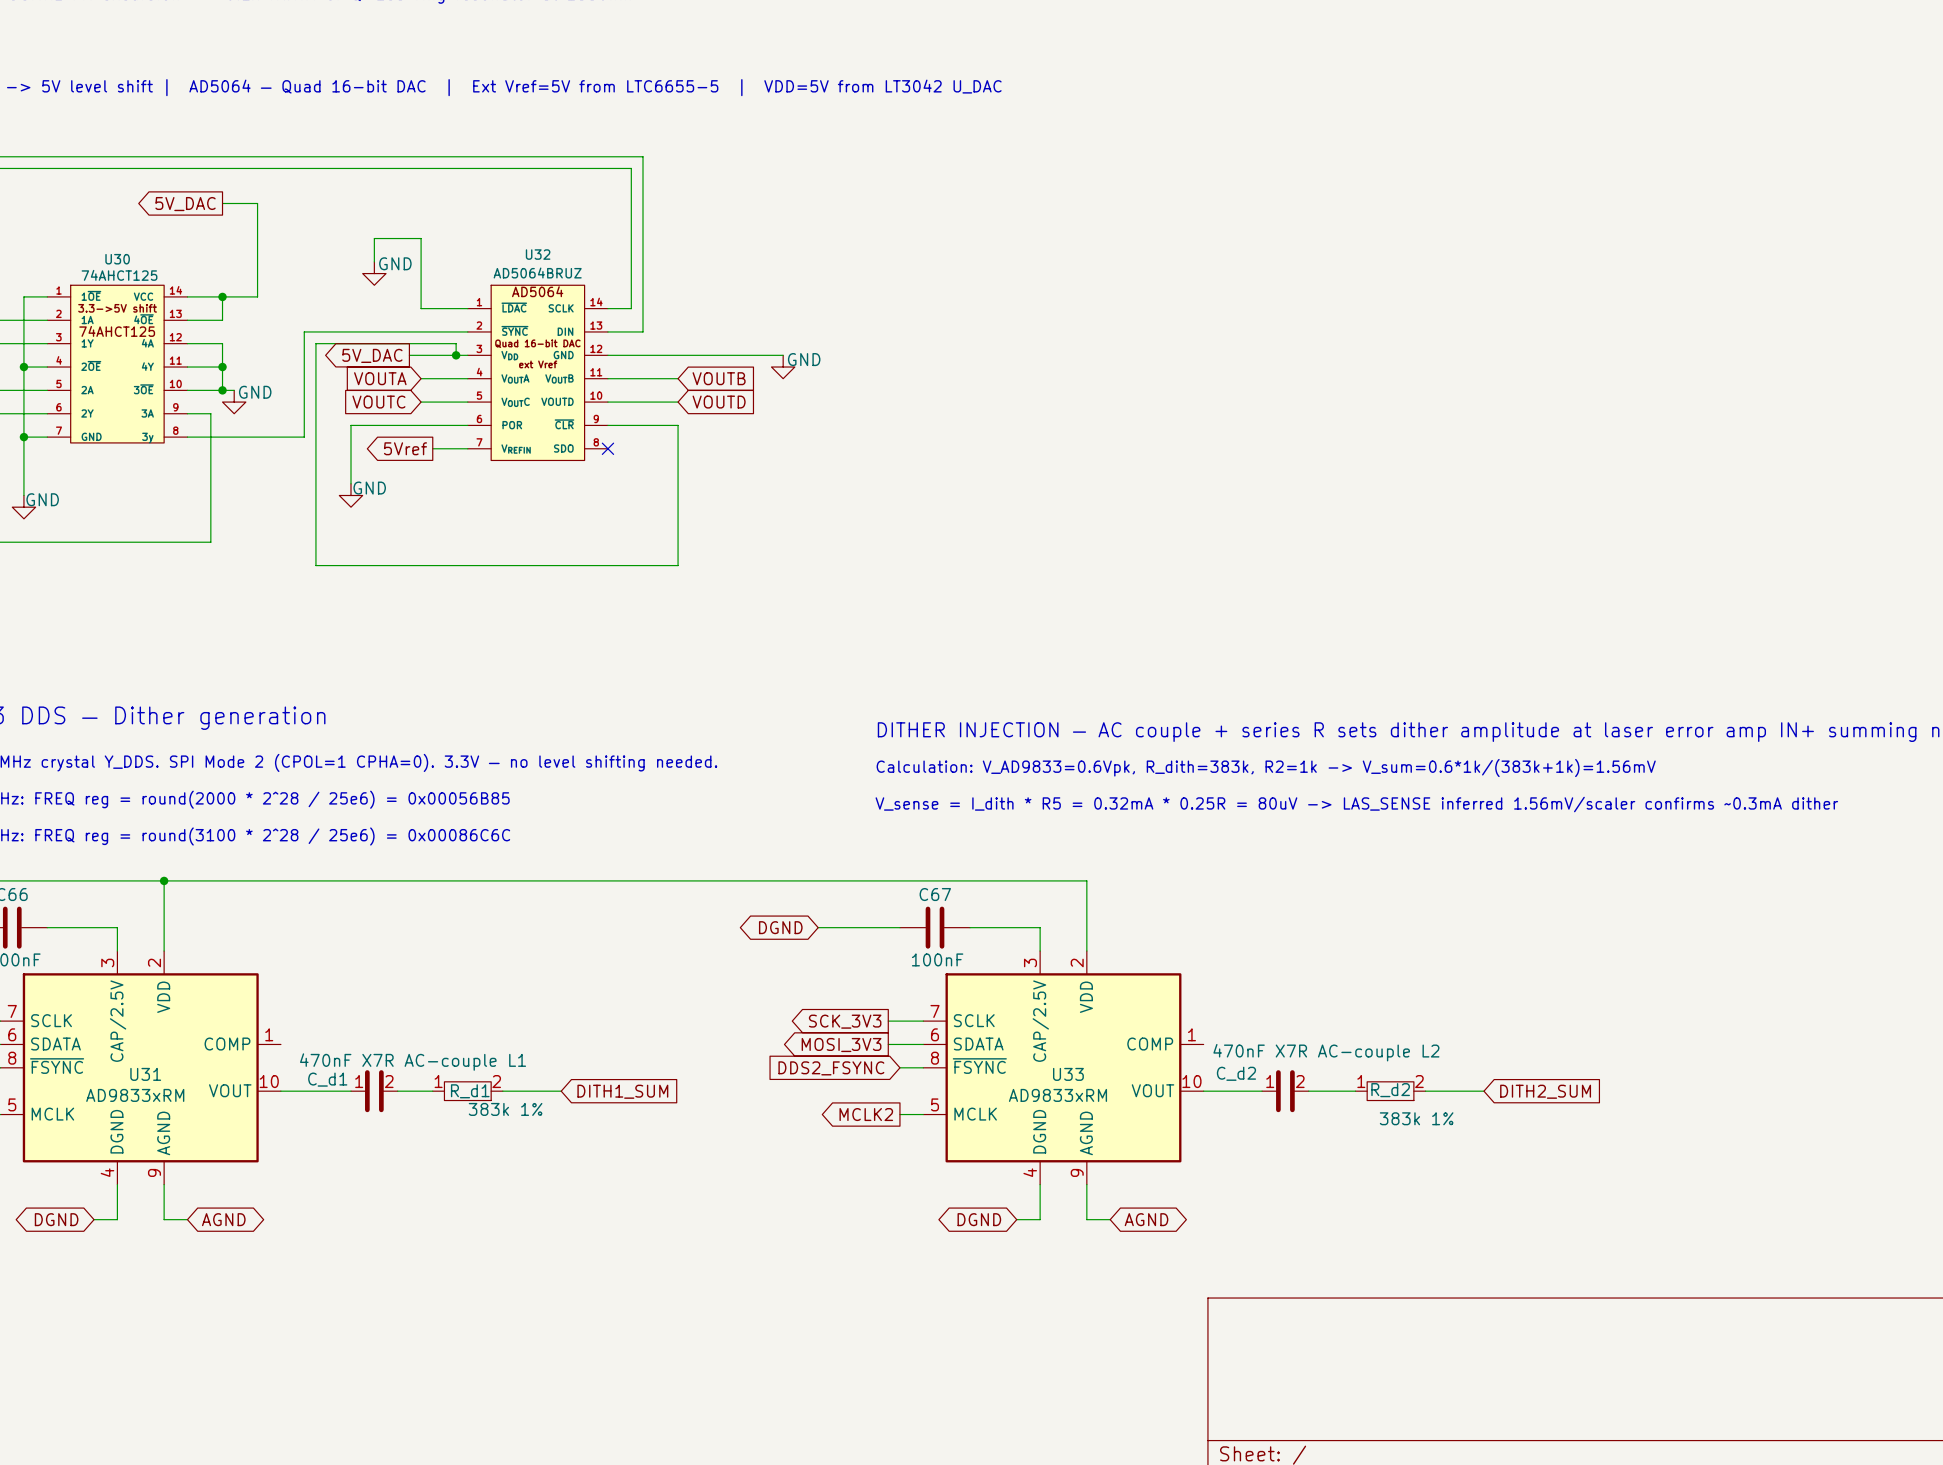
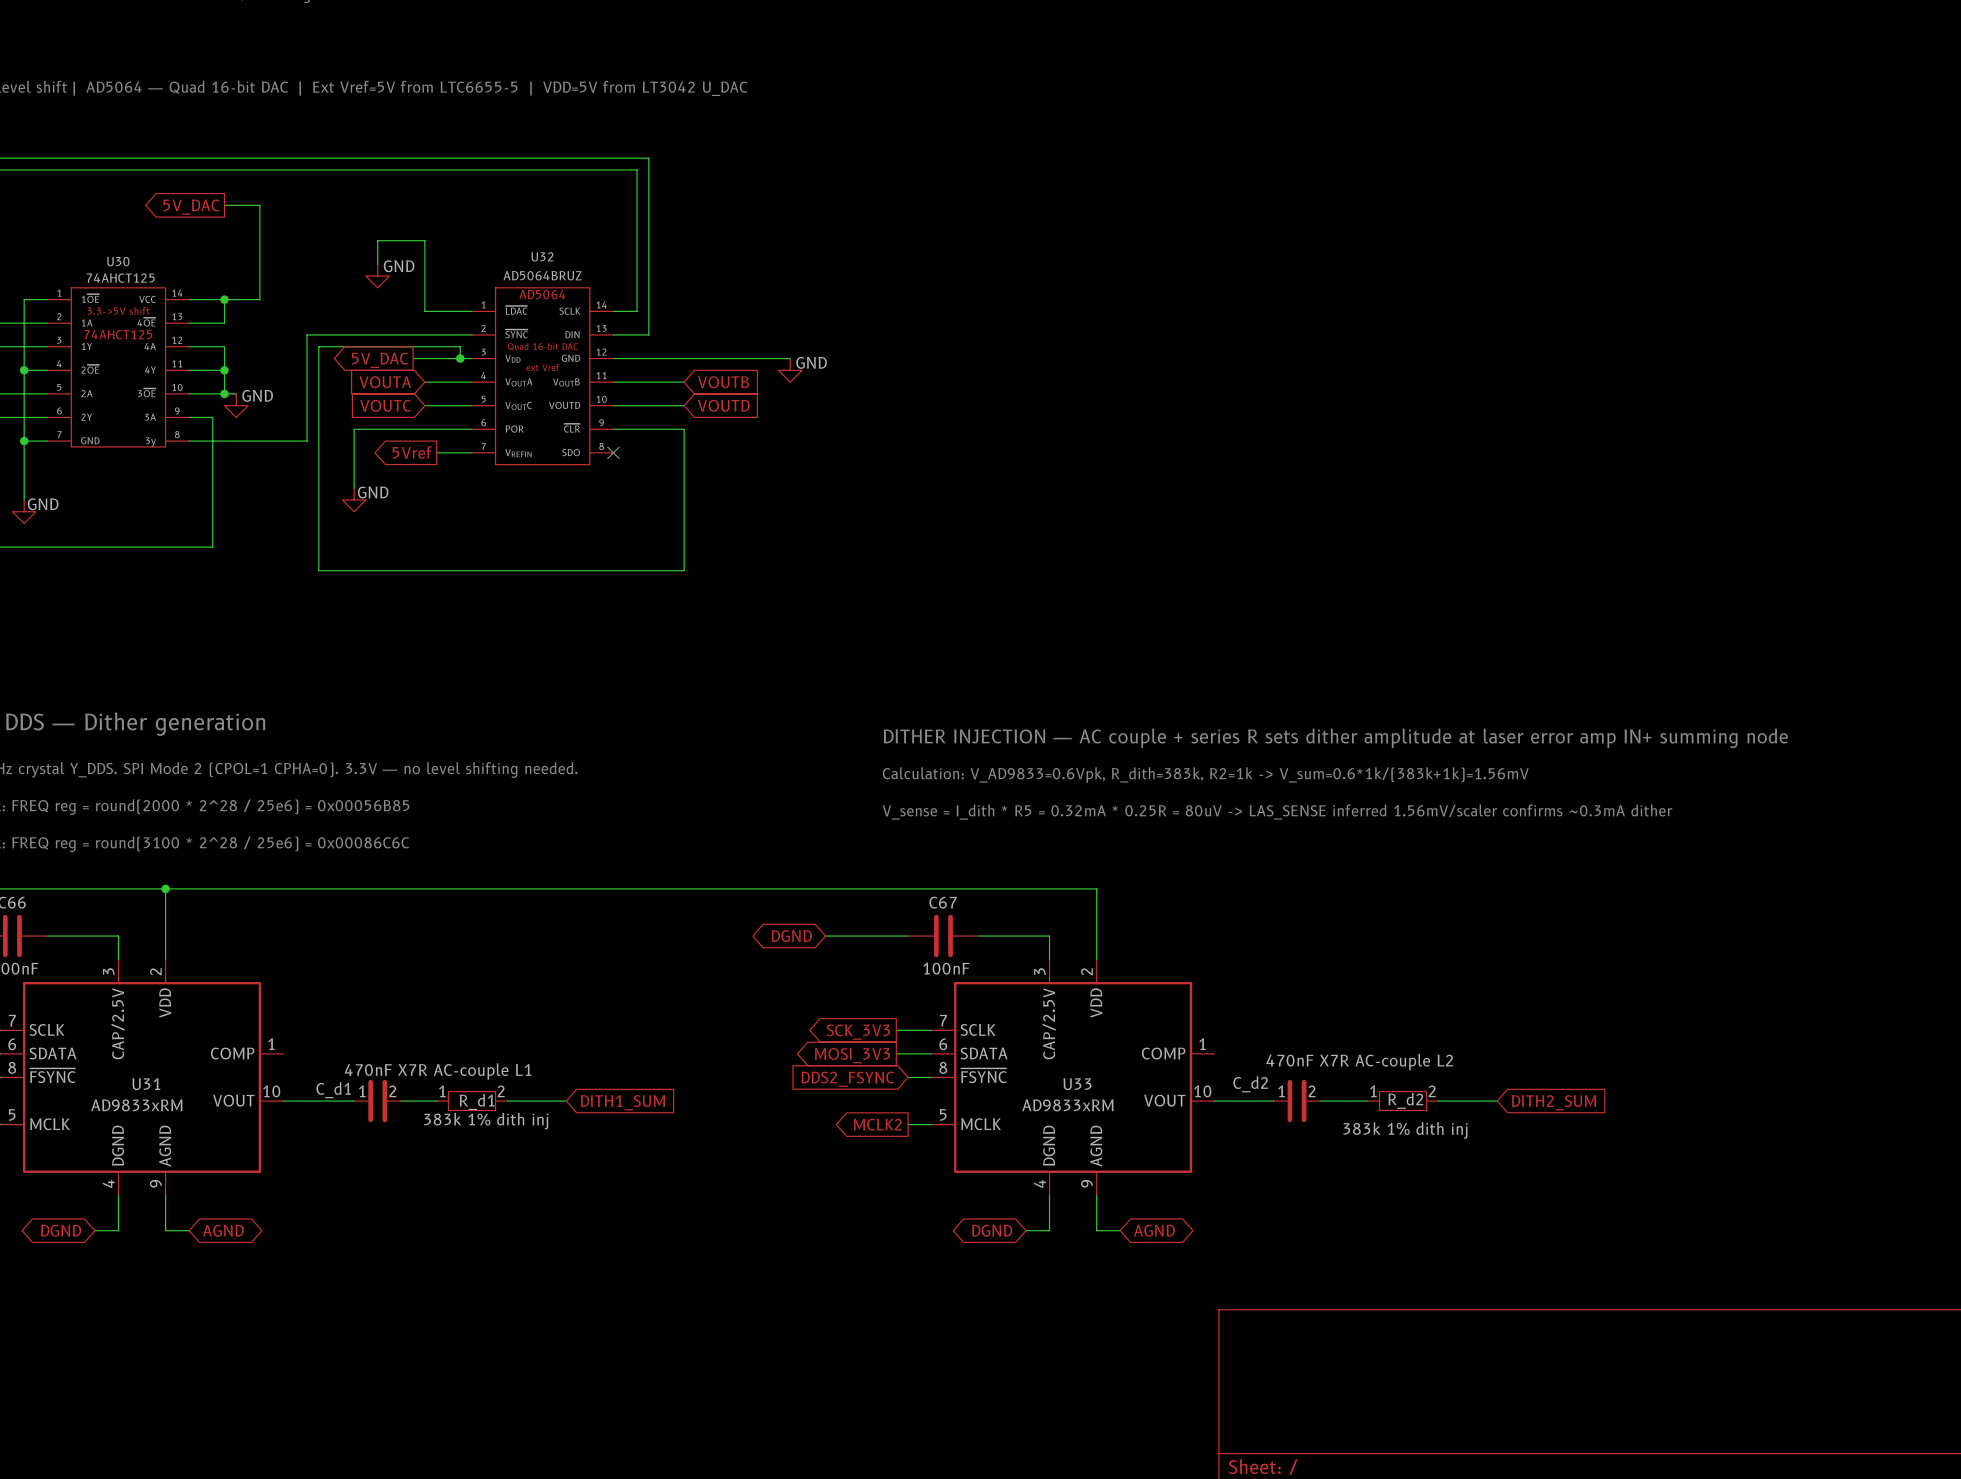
R_d1 value: 383k 1% (505, 1109) -> 383k 1% dith inj (486, 1121)
R_d2 value: 383k 1% (1416, 1118) -> 383k 1% dith inj (1405, 1130)

